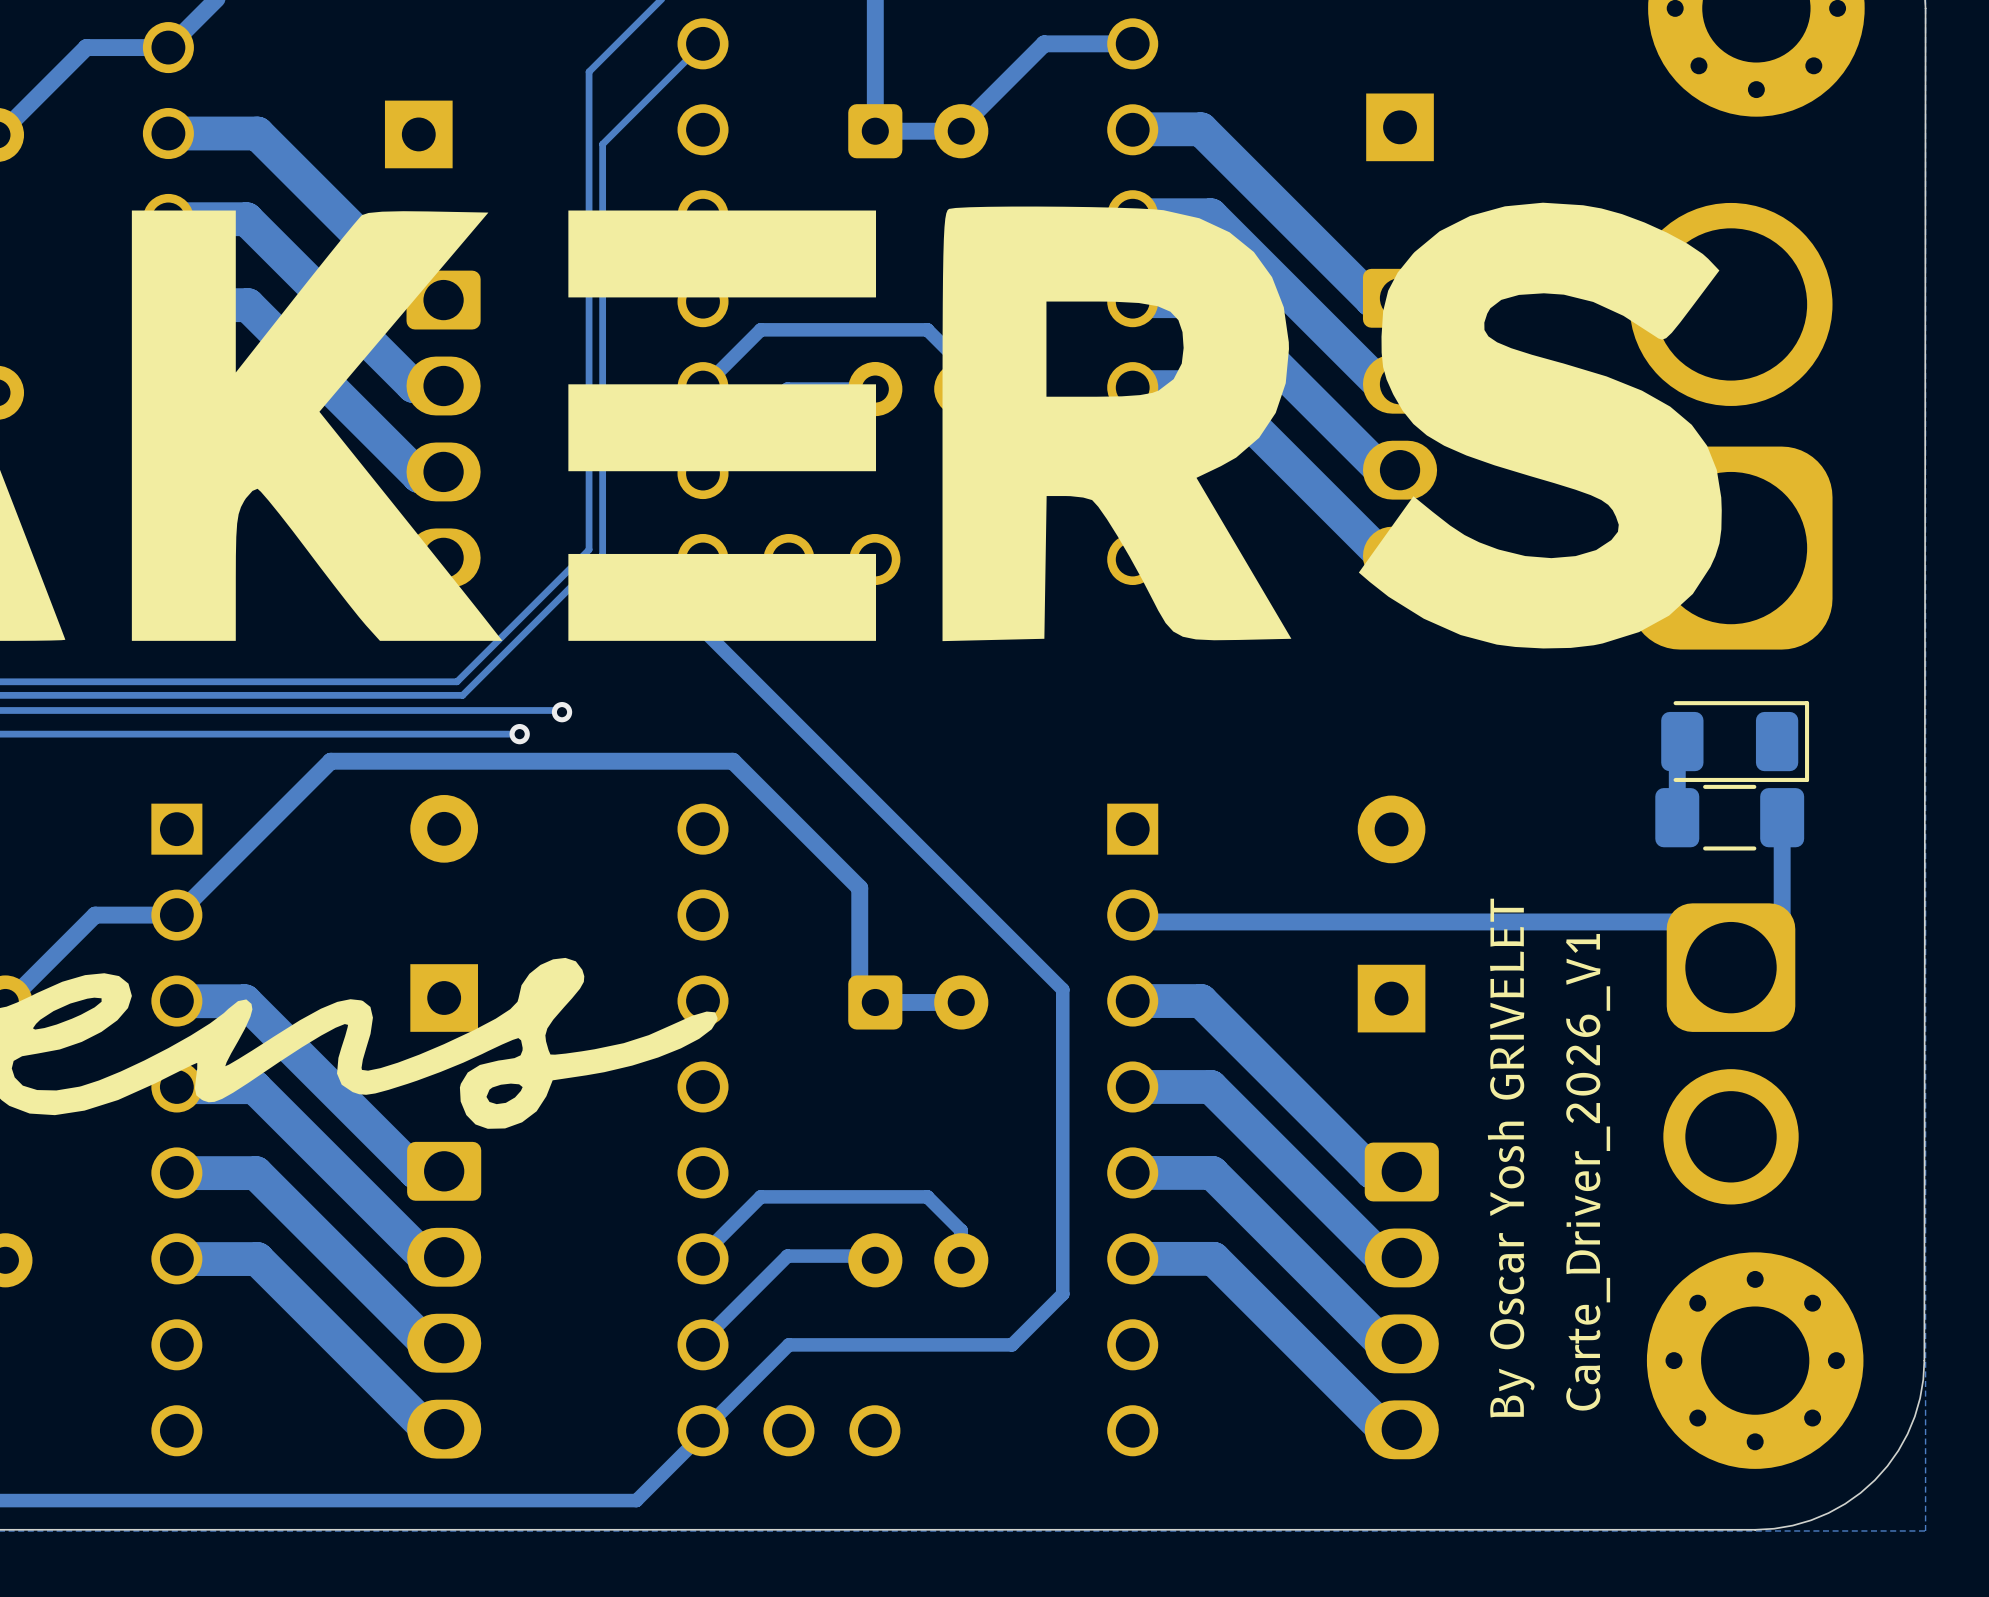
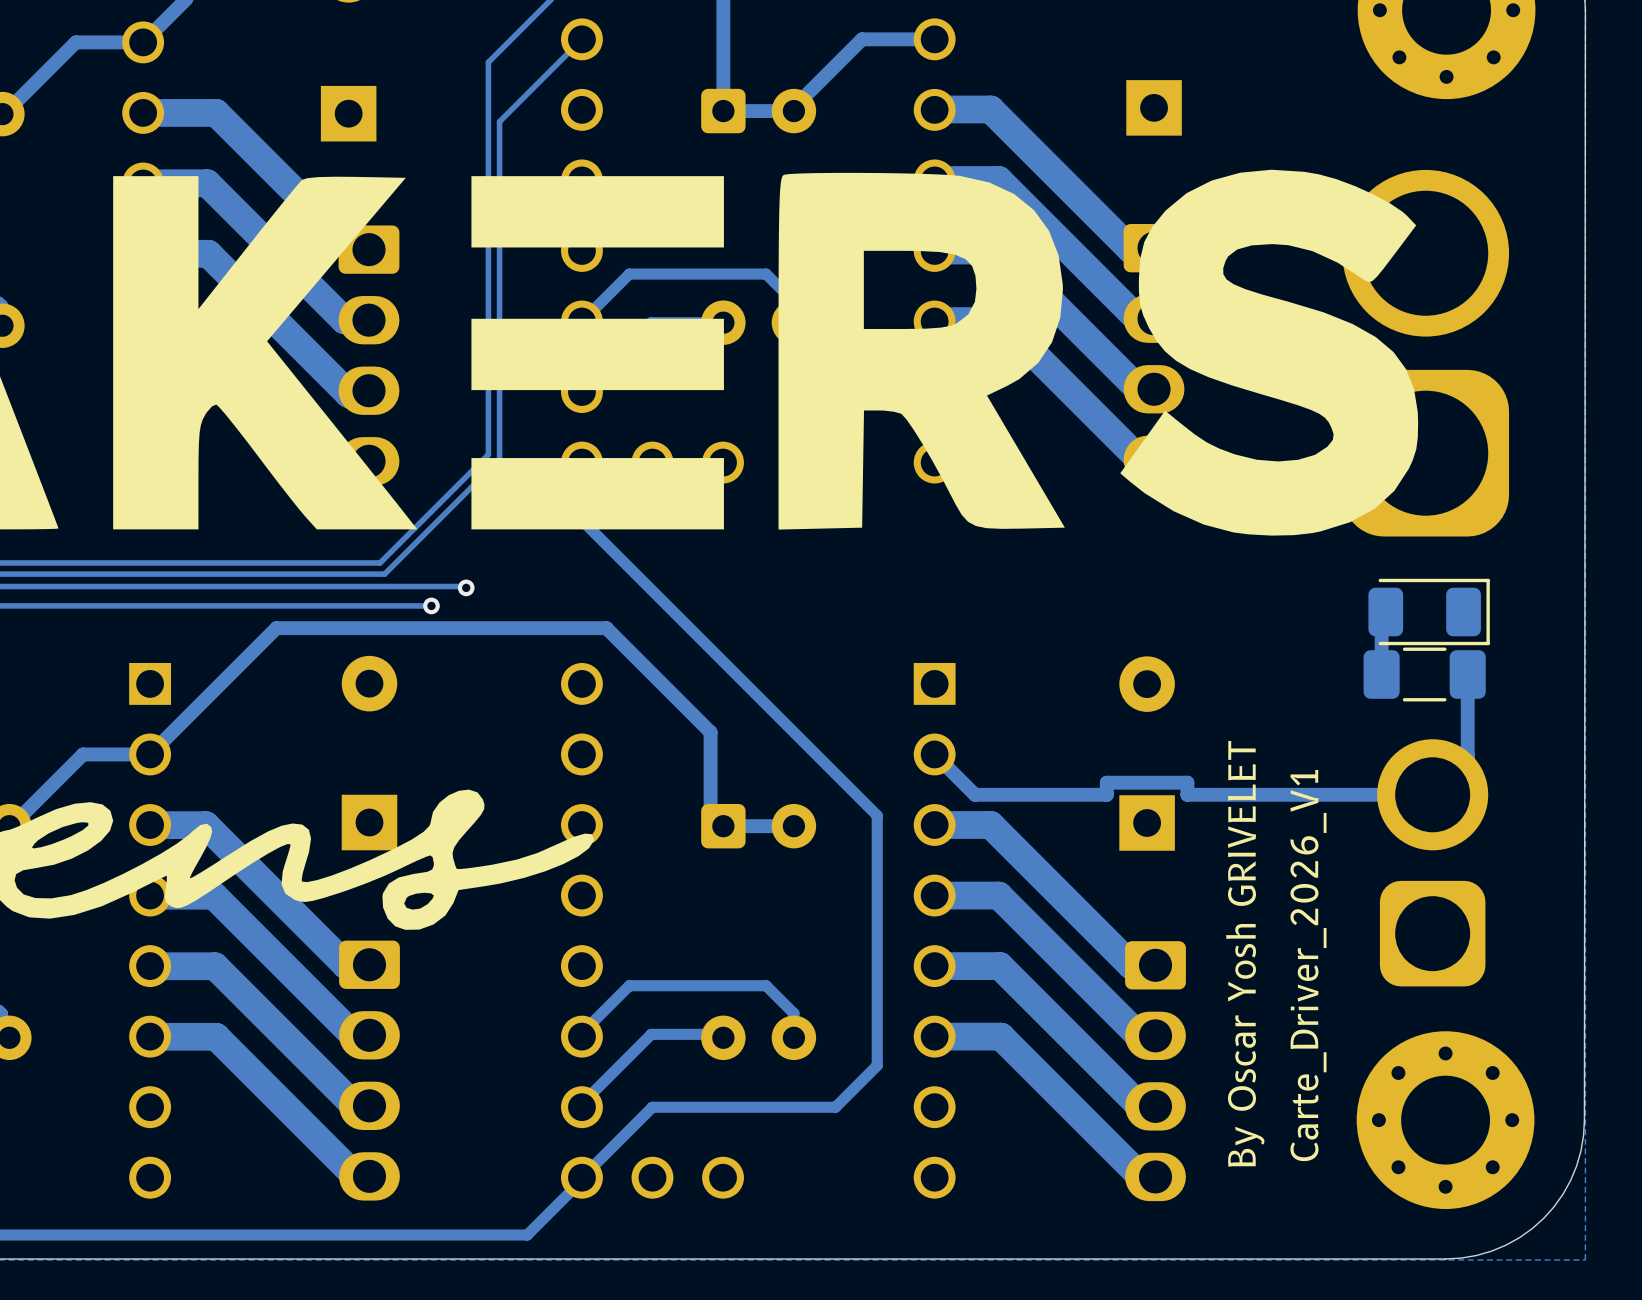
track: (1720, 921) (1139, 921) -> (1467, 755) (1467, 759) (1432, 794) (1187, 794) (1187, 782) (1106, 782) (1106, 794) (974, 794) (940, 760)
part rotation: 0° (1731, 1053) -> 180° (1432, 862)

